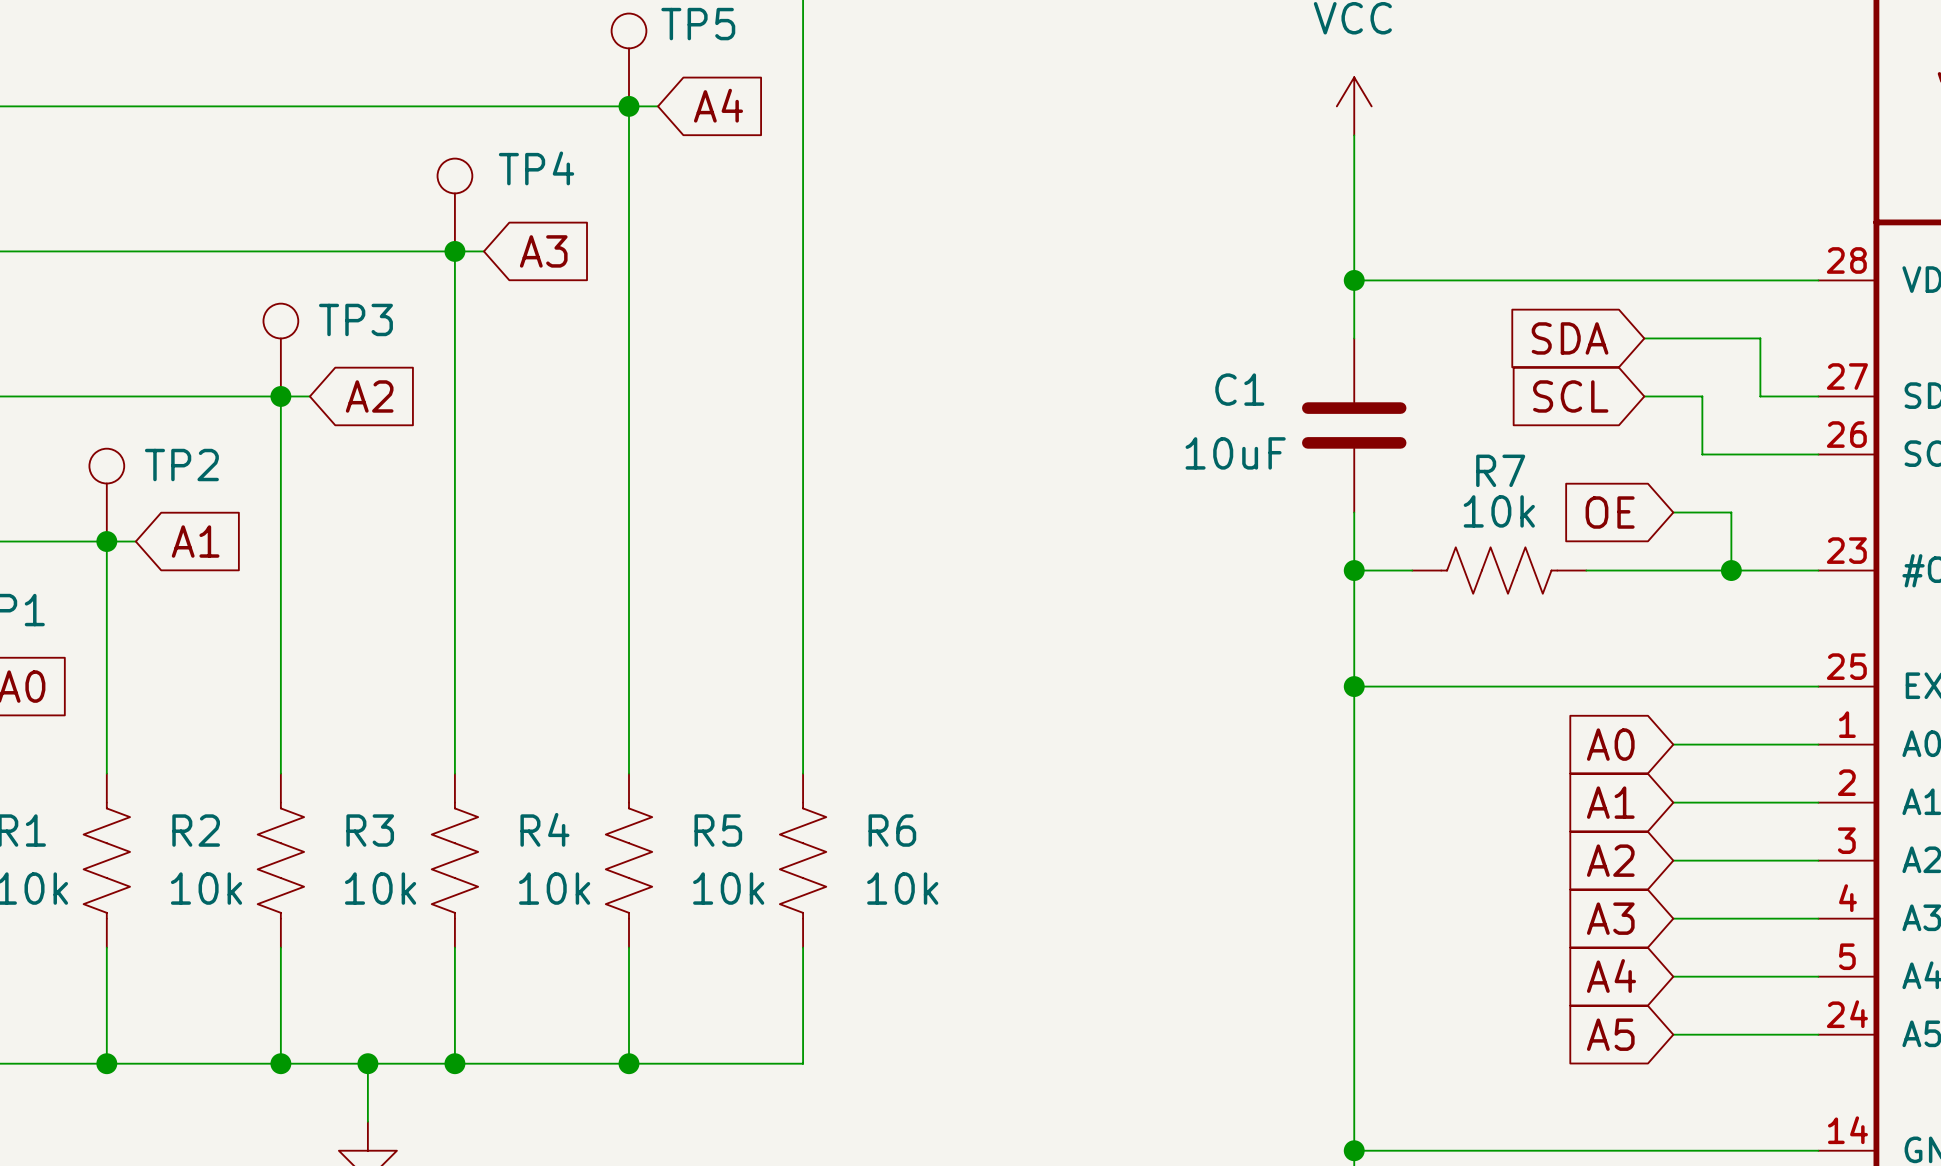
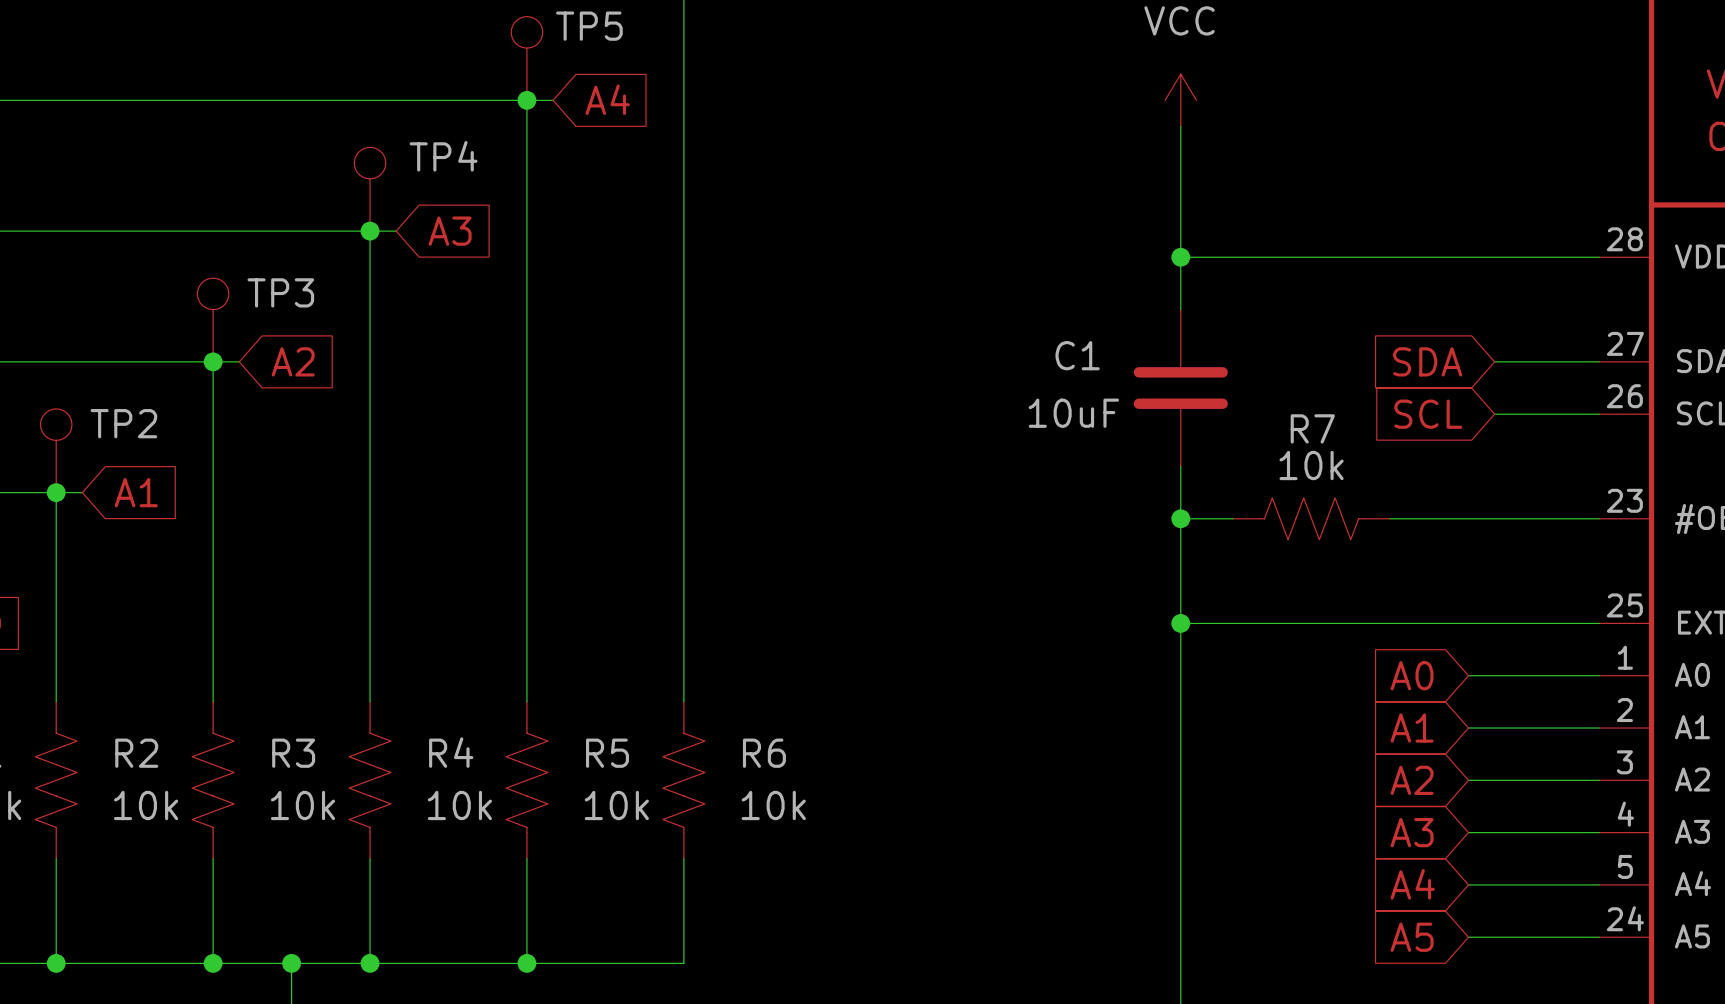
global label position: SDA (1570, 338) -> SDA (1427, 361)
wire: (1644, 338) (1760, 338) (1760, 396) -> (1494, 361) (1546, 361)
global label position: SCL (1570, 396) -> SCL (1428, 414)
wire: (1644, 396) (1702, 396) (1702, 454) -> none
global label: OE (1610, 512) -> none
wire: (1673, 512) (1731, 512) (1731, 570) -> none
junction: (1731, 570) -> none

